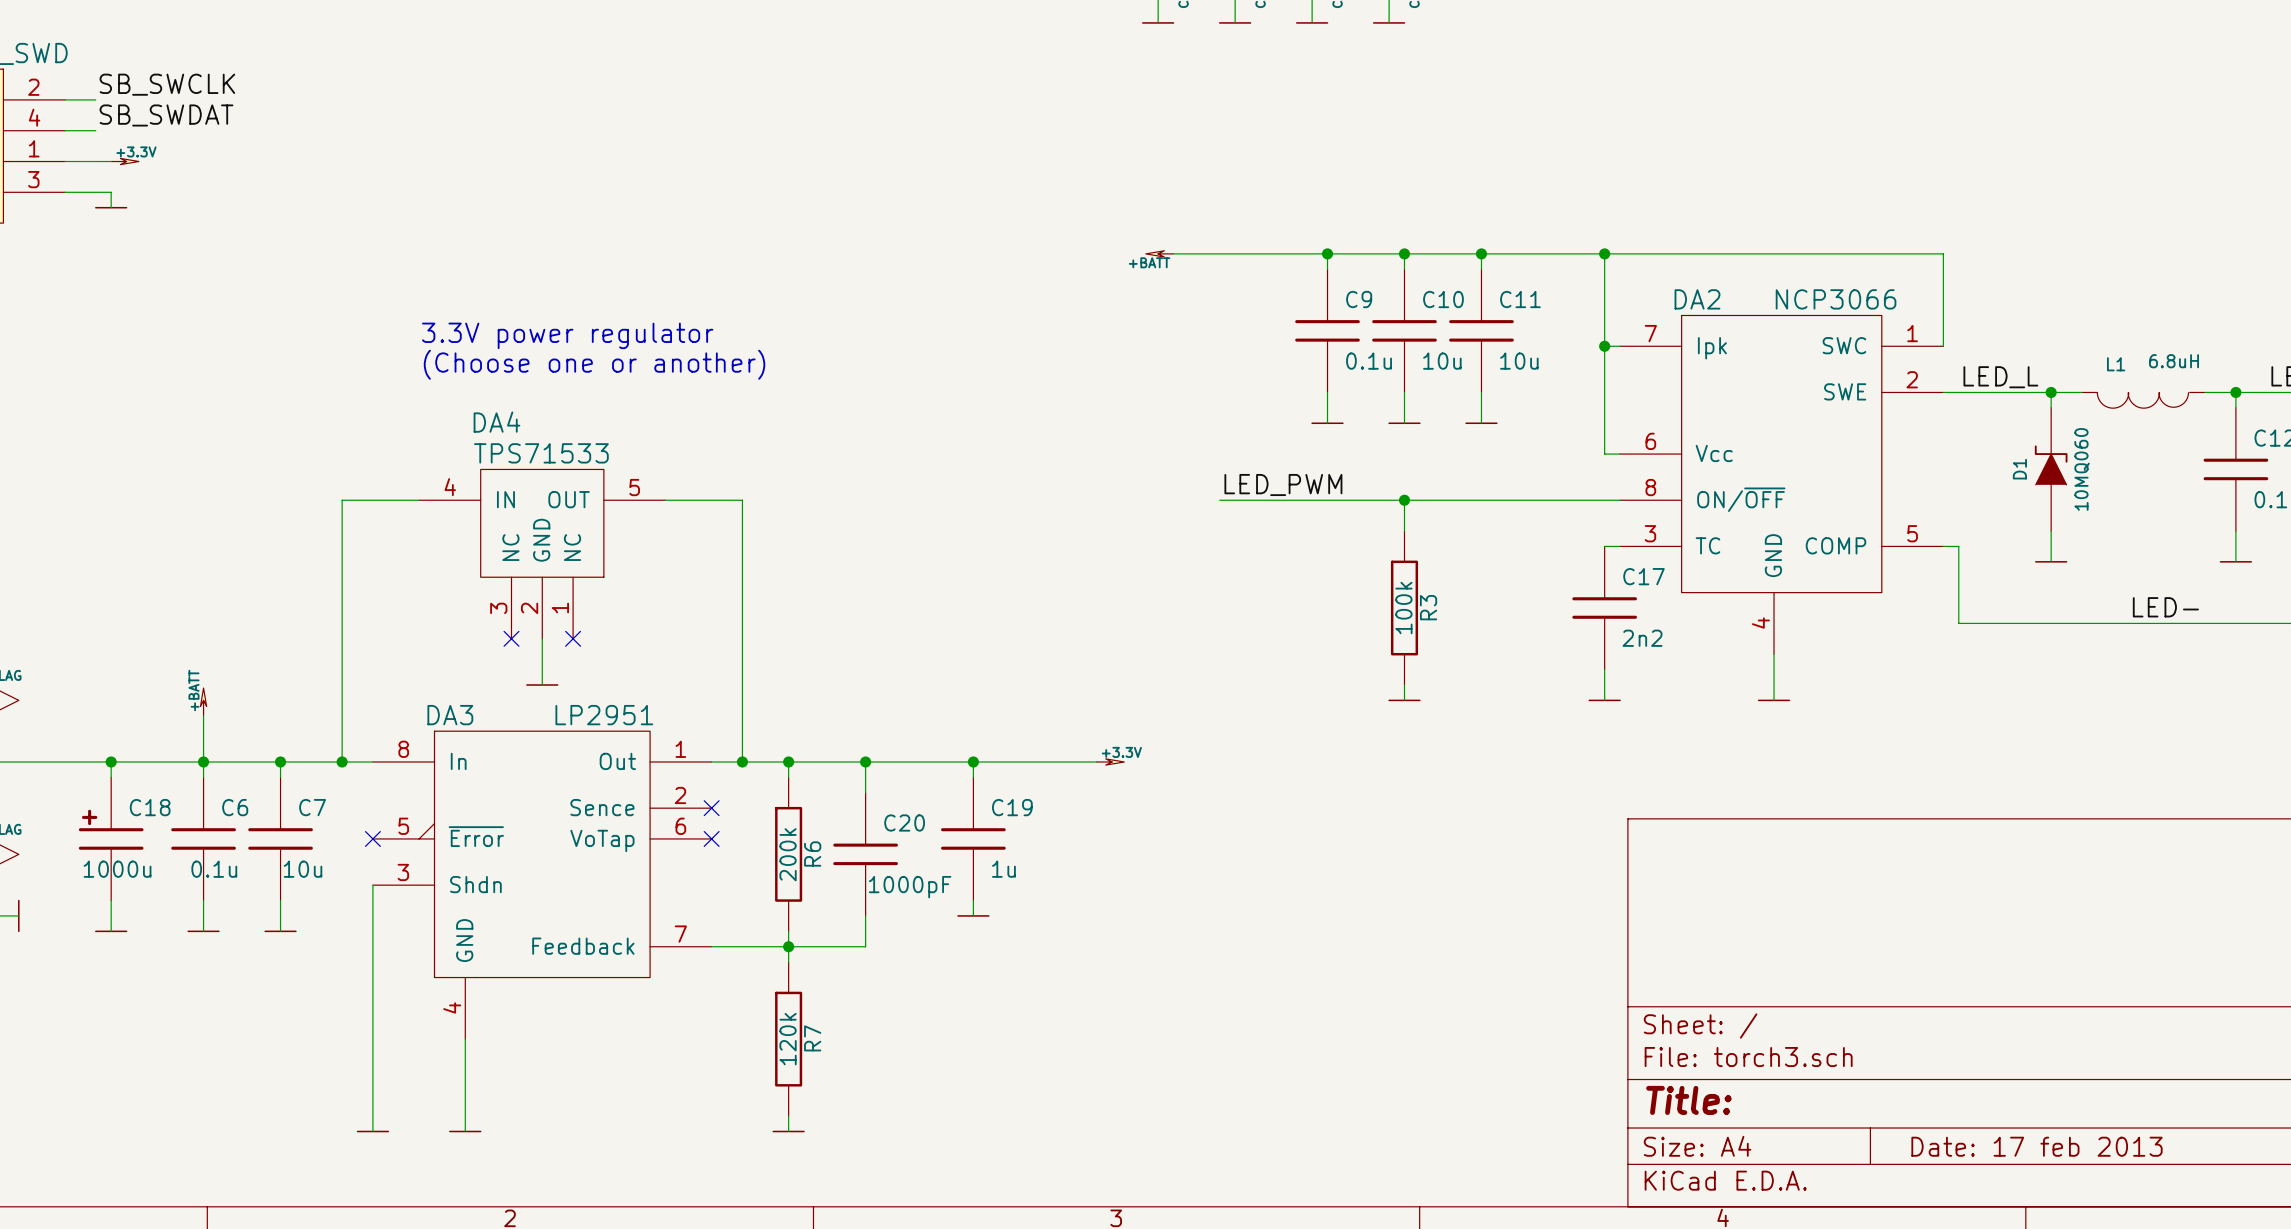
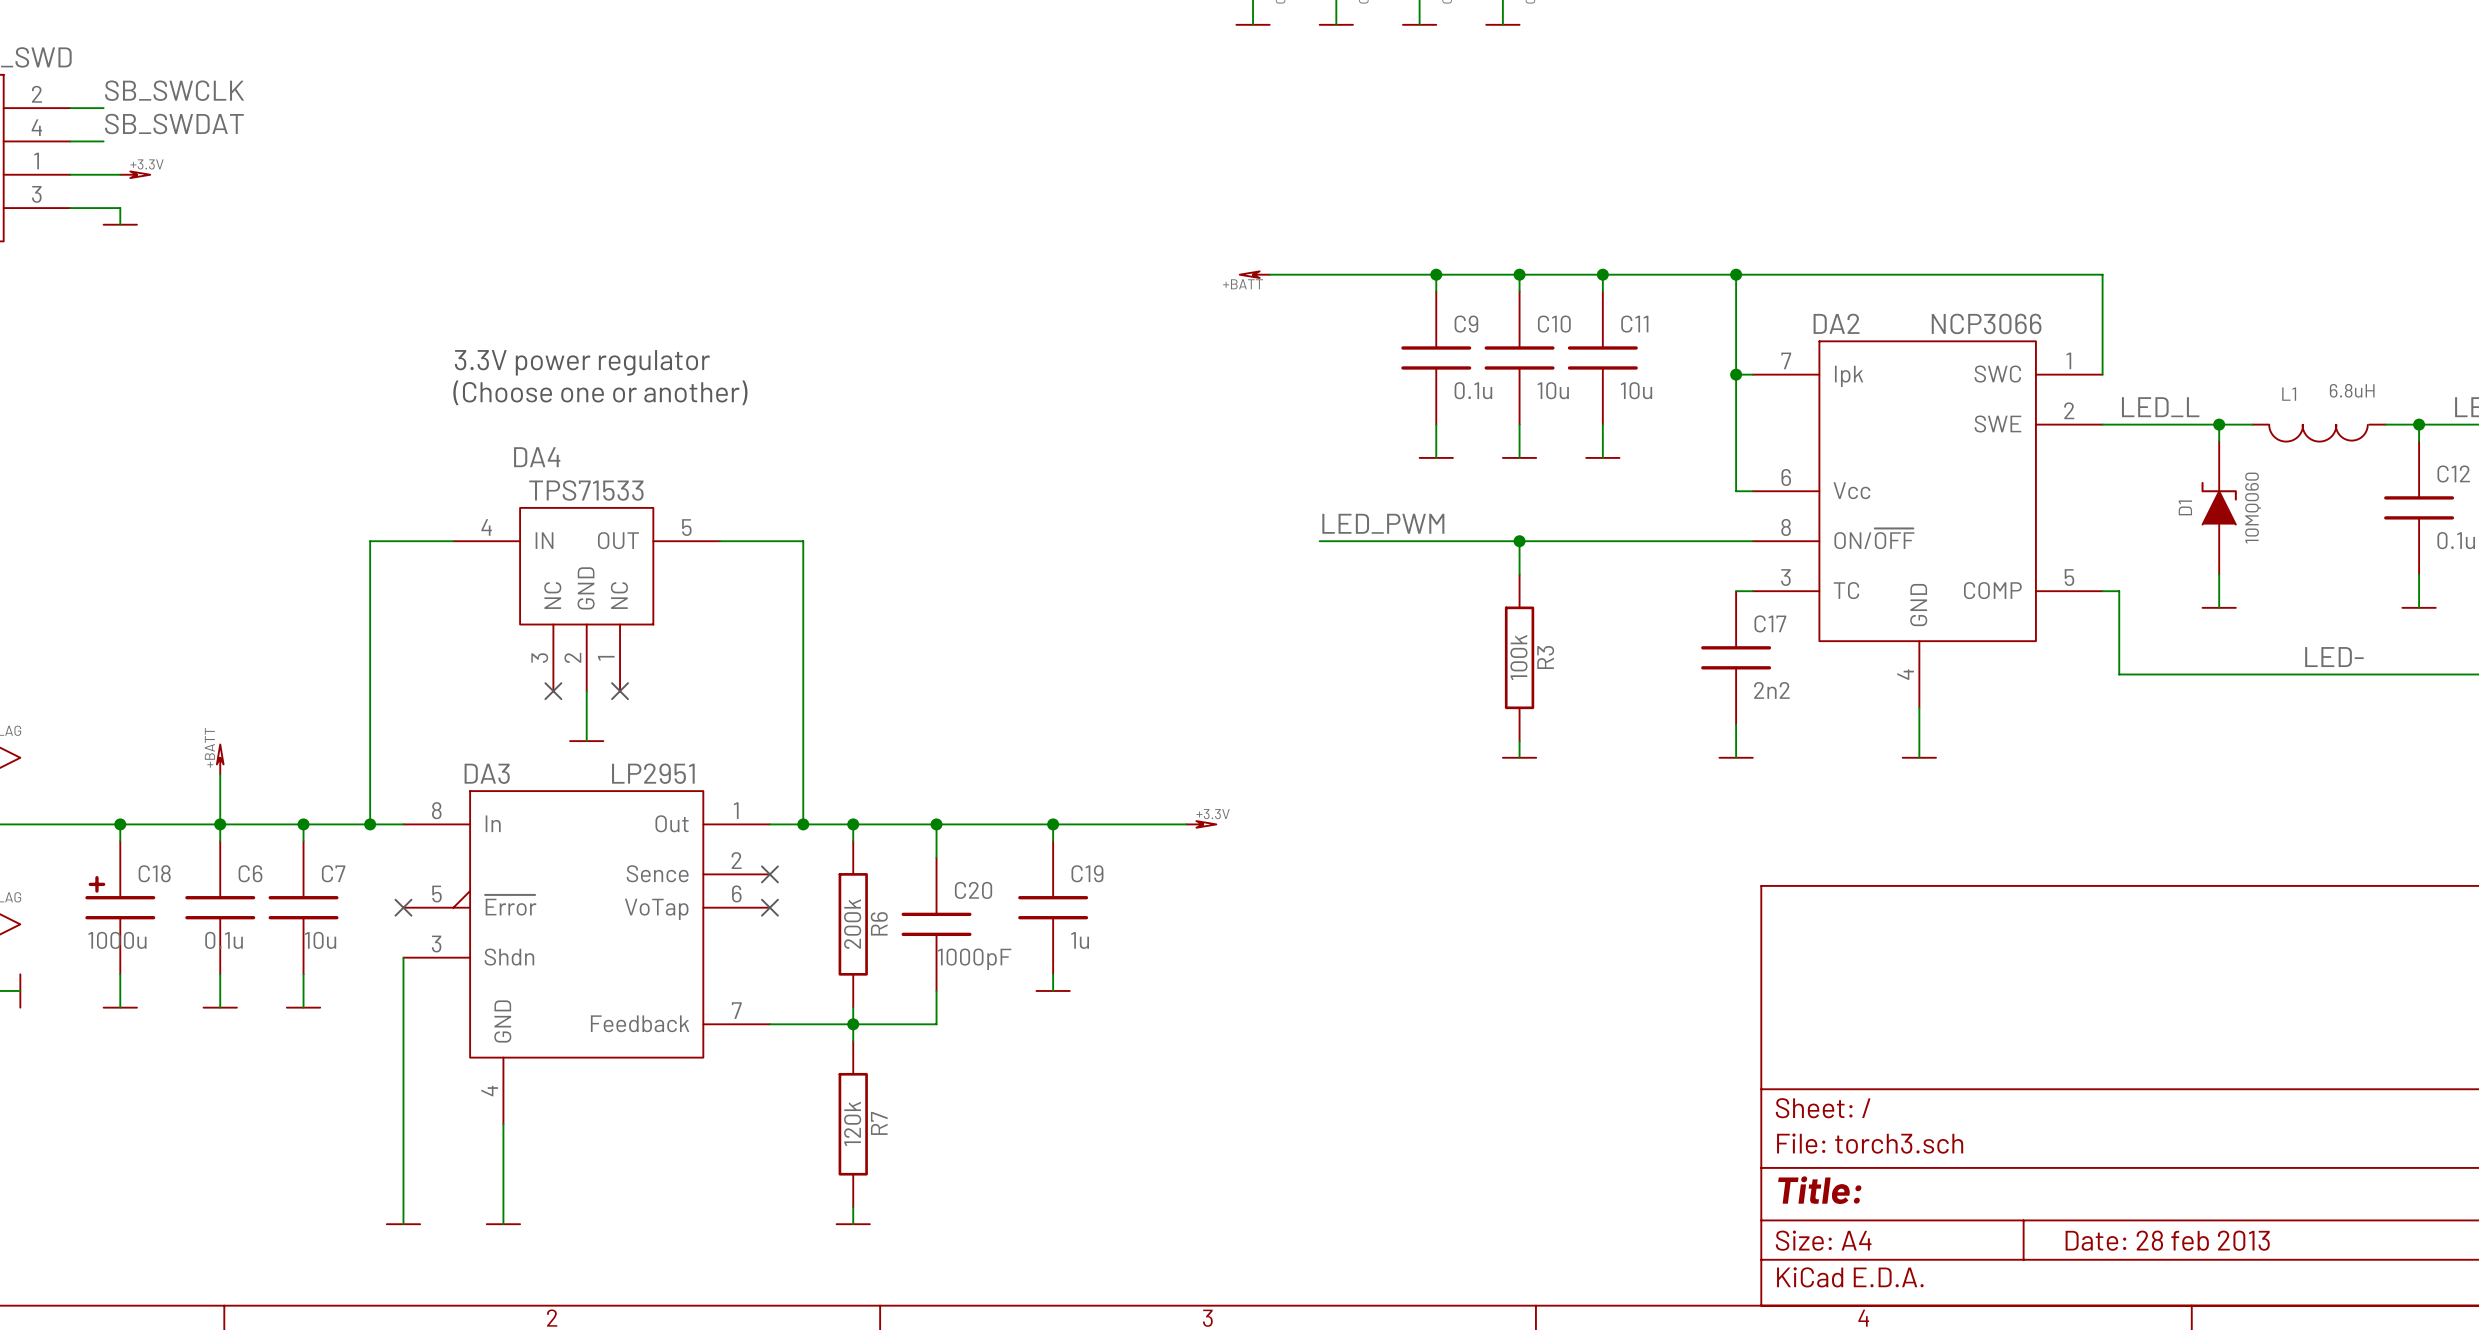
title block: Date: 17 feb 2013 (2037, 1146) -> Date: 28 feb 2013 (2167, 1240)

